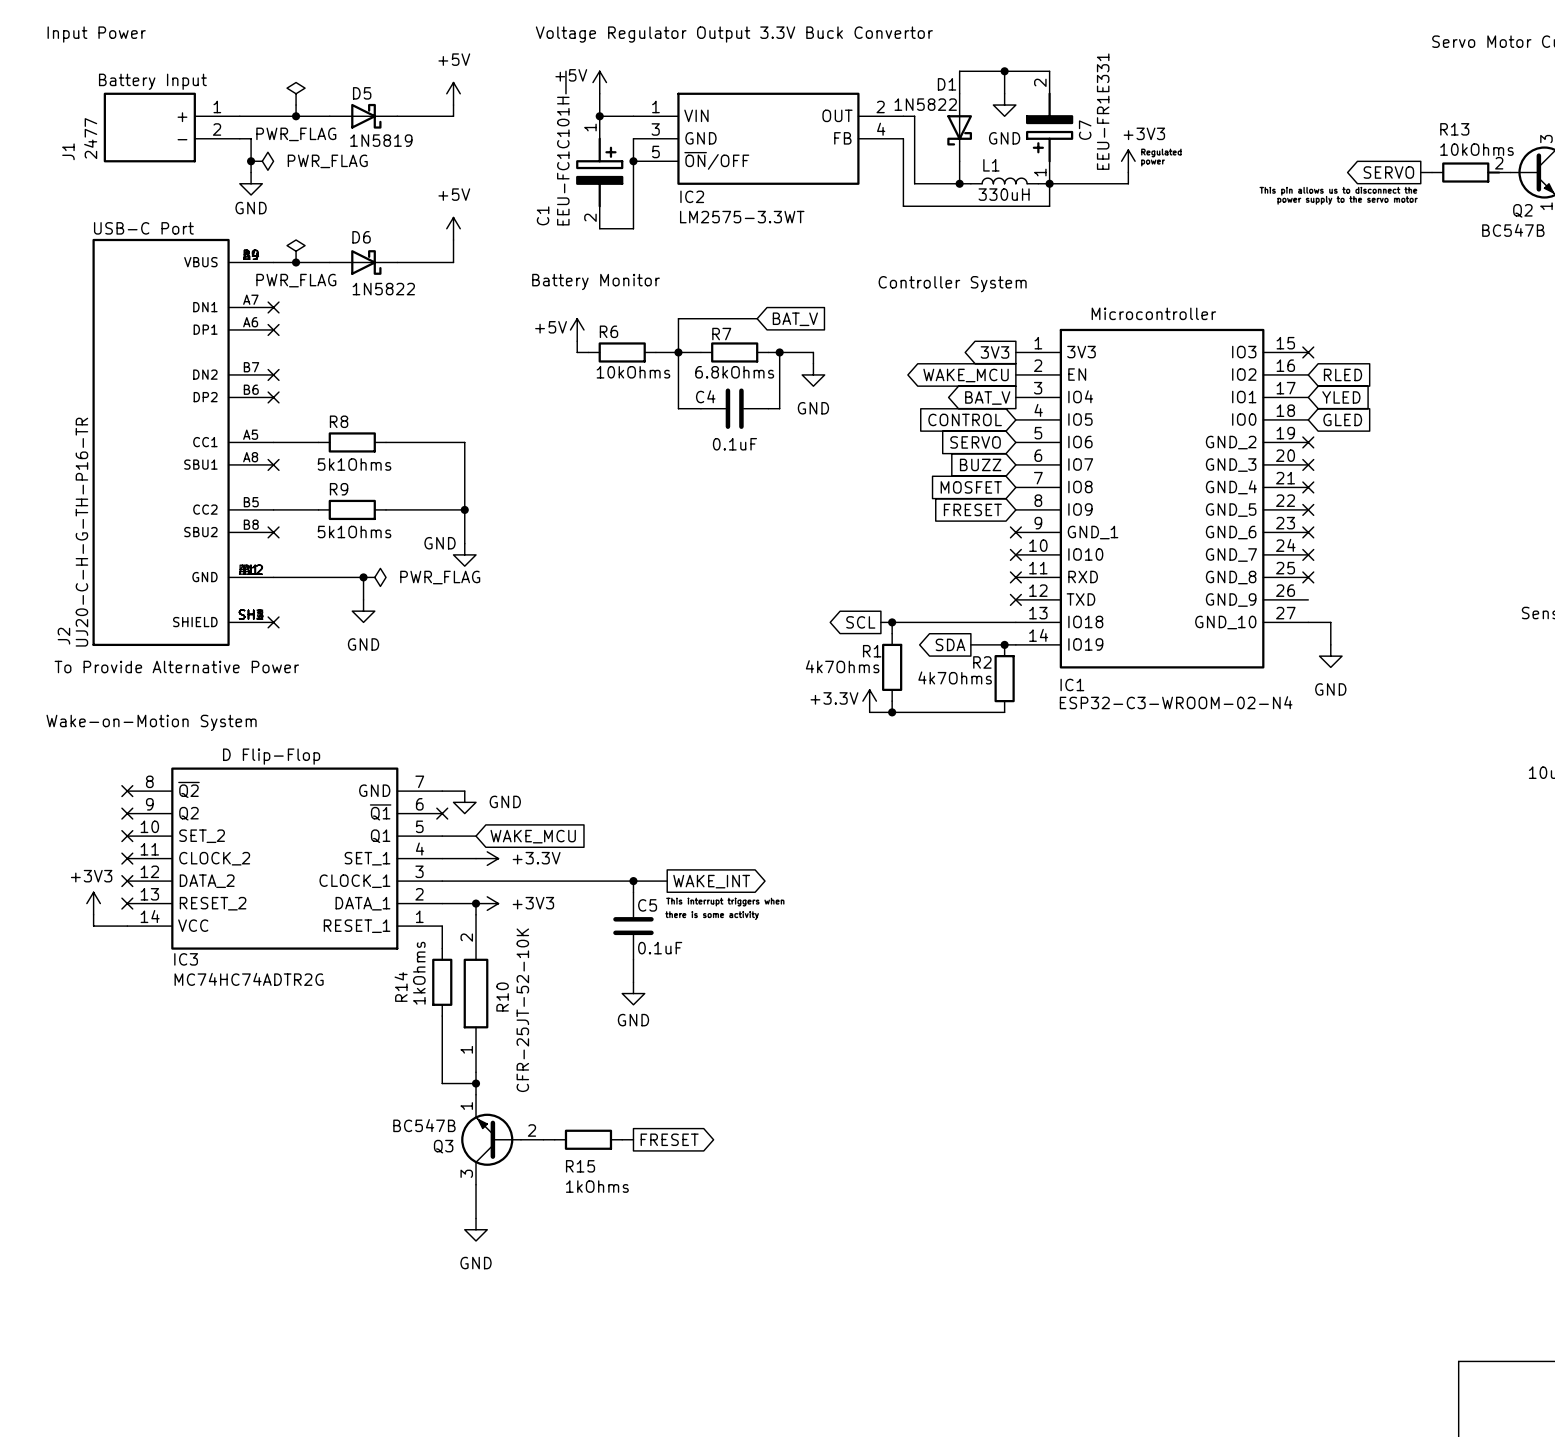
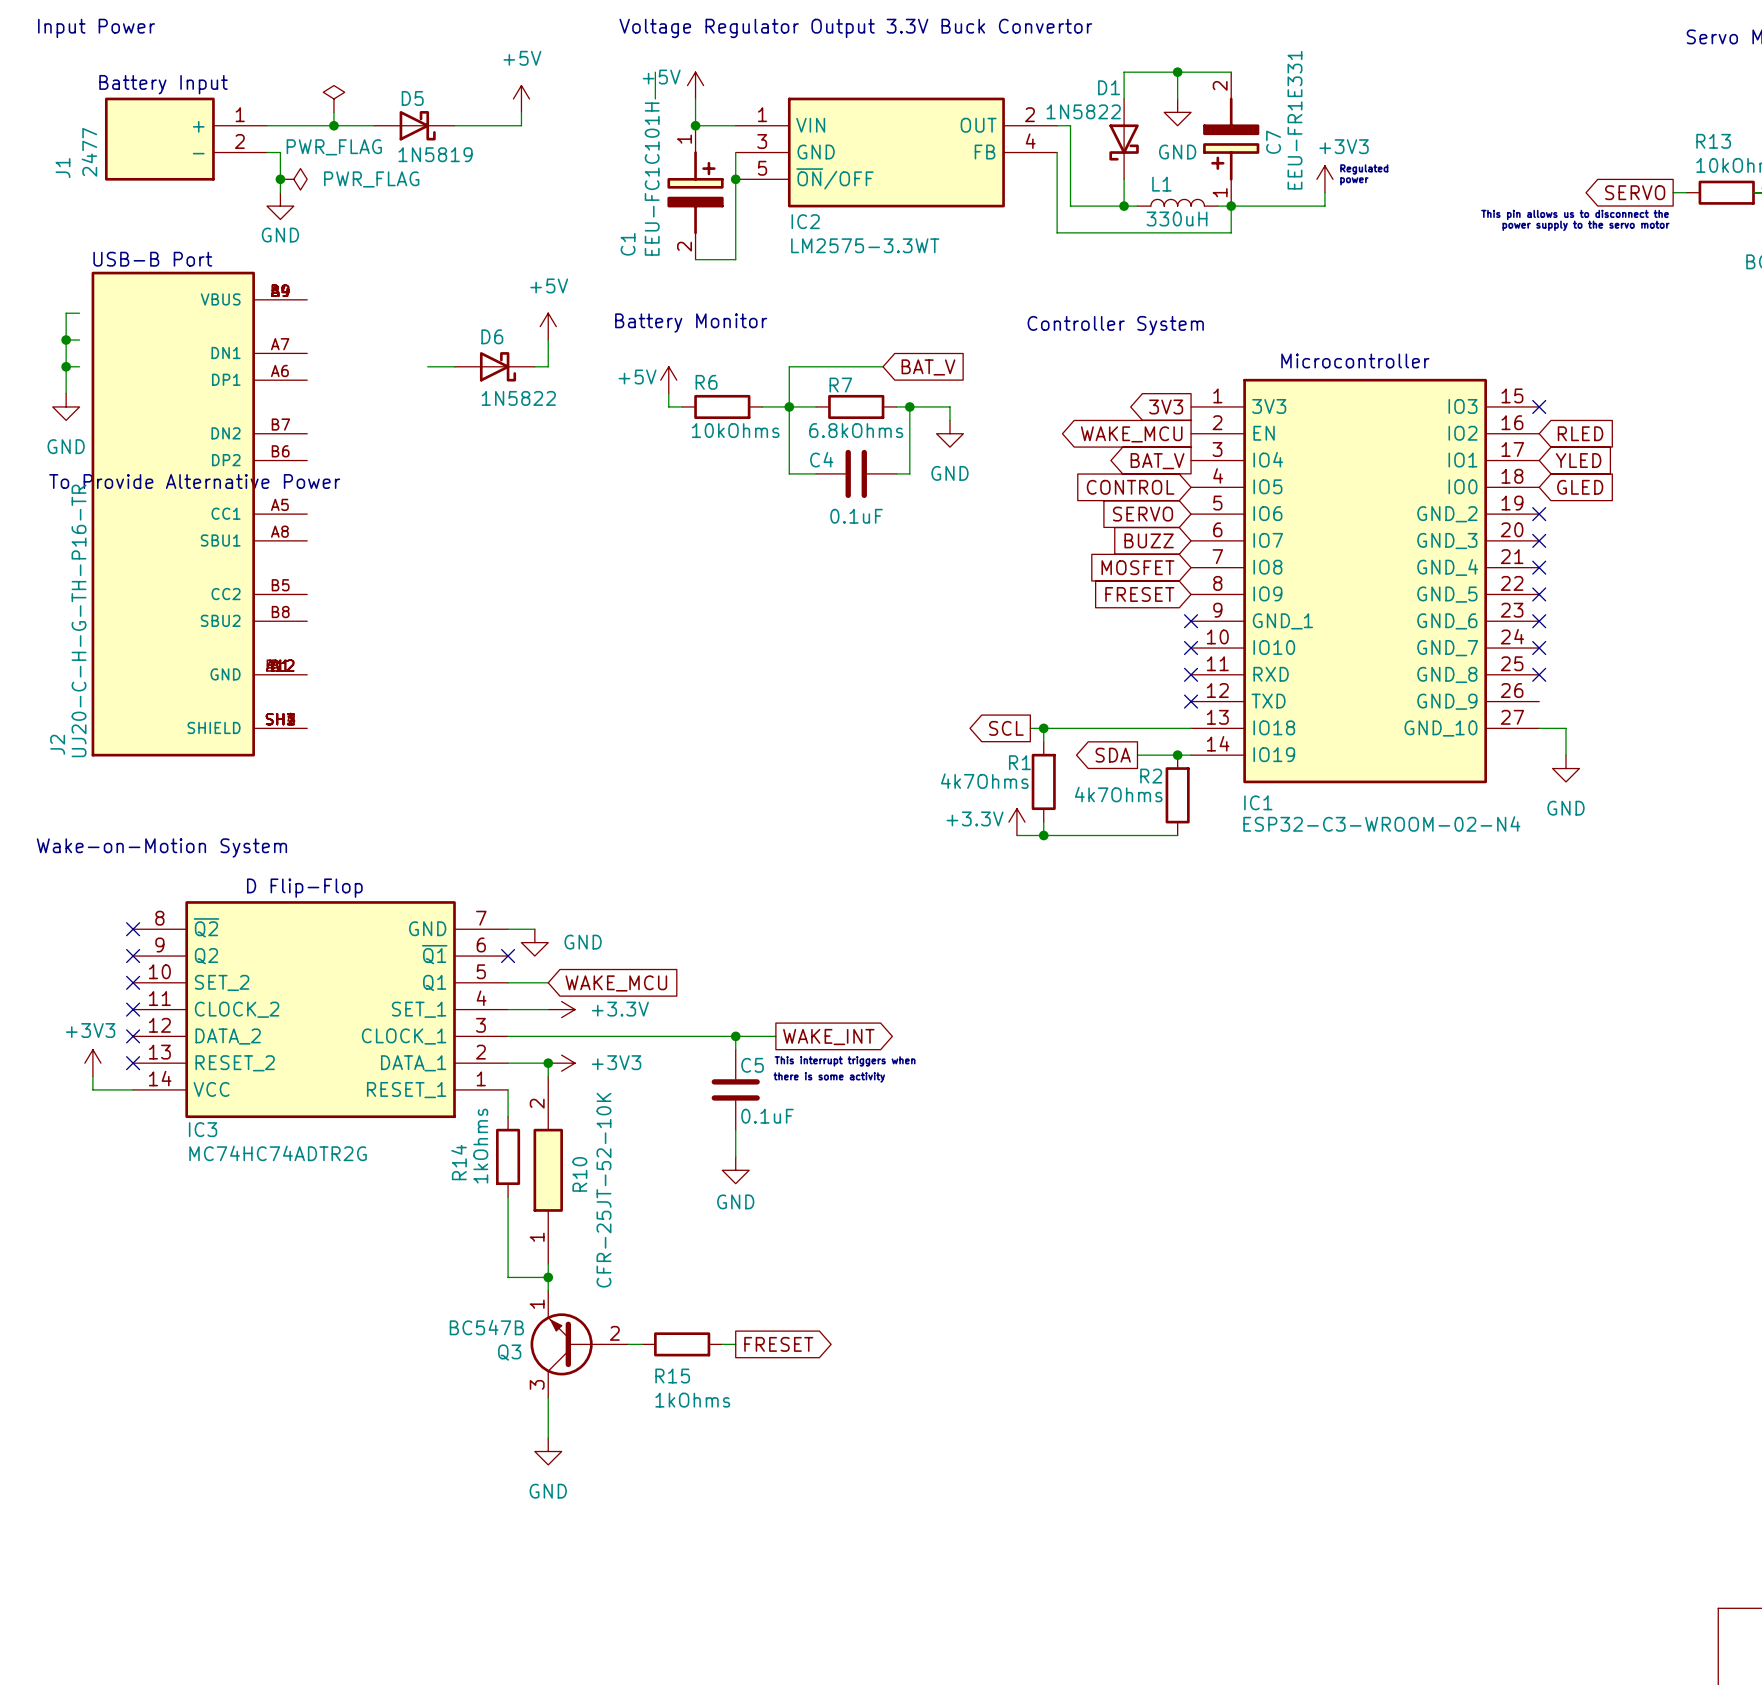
text: USB-C Port (143, 228) -> USB-B Port (152, 259)
power symbol position: +5V (453, 228) -> +5V (548, 326)
wire: (453, 239) (453, 262) (397, 262) -> none
power symbol: PWR_FLAG (296, 251) -> none
wire: (273, 262) (329, 262) -> none
junction: (296, 262) -> none
D6 position: (363, 262) -> (494, 366)
wire: none -> (79, 313) (66, 313) (66, 393)
wire: none -> (66, 340) (79, 340)
junction: none -> (66, 340)
wire: none -> (548, 340) (548, 366) (534, 366)
no-connect mark: (273, 307) -> none
wire: none -> (66, 366) (79, 366)
junction: none -> (66, 366)
wire: none -> (427, 366) (454, 366)
no-connect mark: (273, 329) -> none
power symbol: none -> GND (66, 406)
no-connect mark: (273, 374) -> none
no-connect mark: (273, 397) -> none
text: none -> To Provide Alternative Power (194, 481)
wire: (273, 442) (318, 442) -> none
R8: 5k1Ohms (352, 442) -> none
wire: (386, 442) (464, 442) (464, 543) -> none
no-connect mark: (273, 464) -> none
wire: (273, 509) (318, 509) -> none
R9: 5k1Ohms (352, 509) -> none
wire: (386, 509) (464, 509) -> none
junction: (464, 509) -> none
no-connect mark: (273, 532) -> none
power symbol: GND (464, 554) -> none
wire: (273, 577) (363, 577) (363, 599) -> none
junction: (363, 577) -> none
power symbol: PWR_FLAG (374, 577) -> none
power symbol: GND (363, 611) -> none
no-connect mark: (273, 622) -> none
text: To Provide Alternative Power (176, 667) -> none

